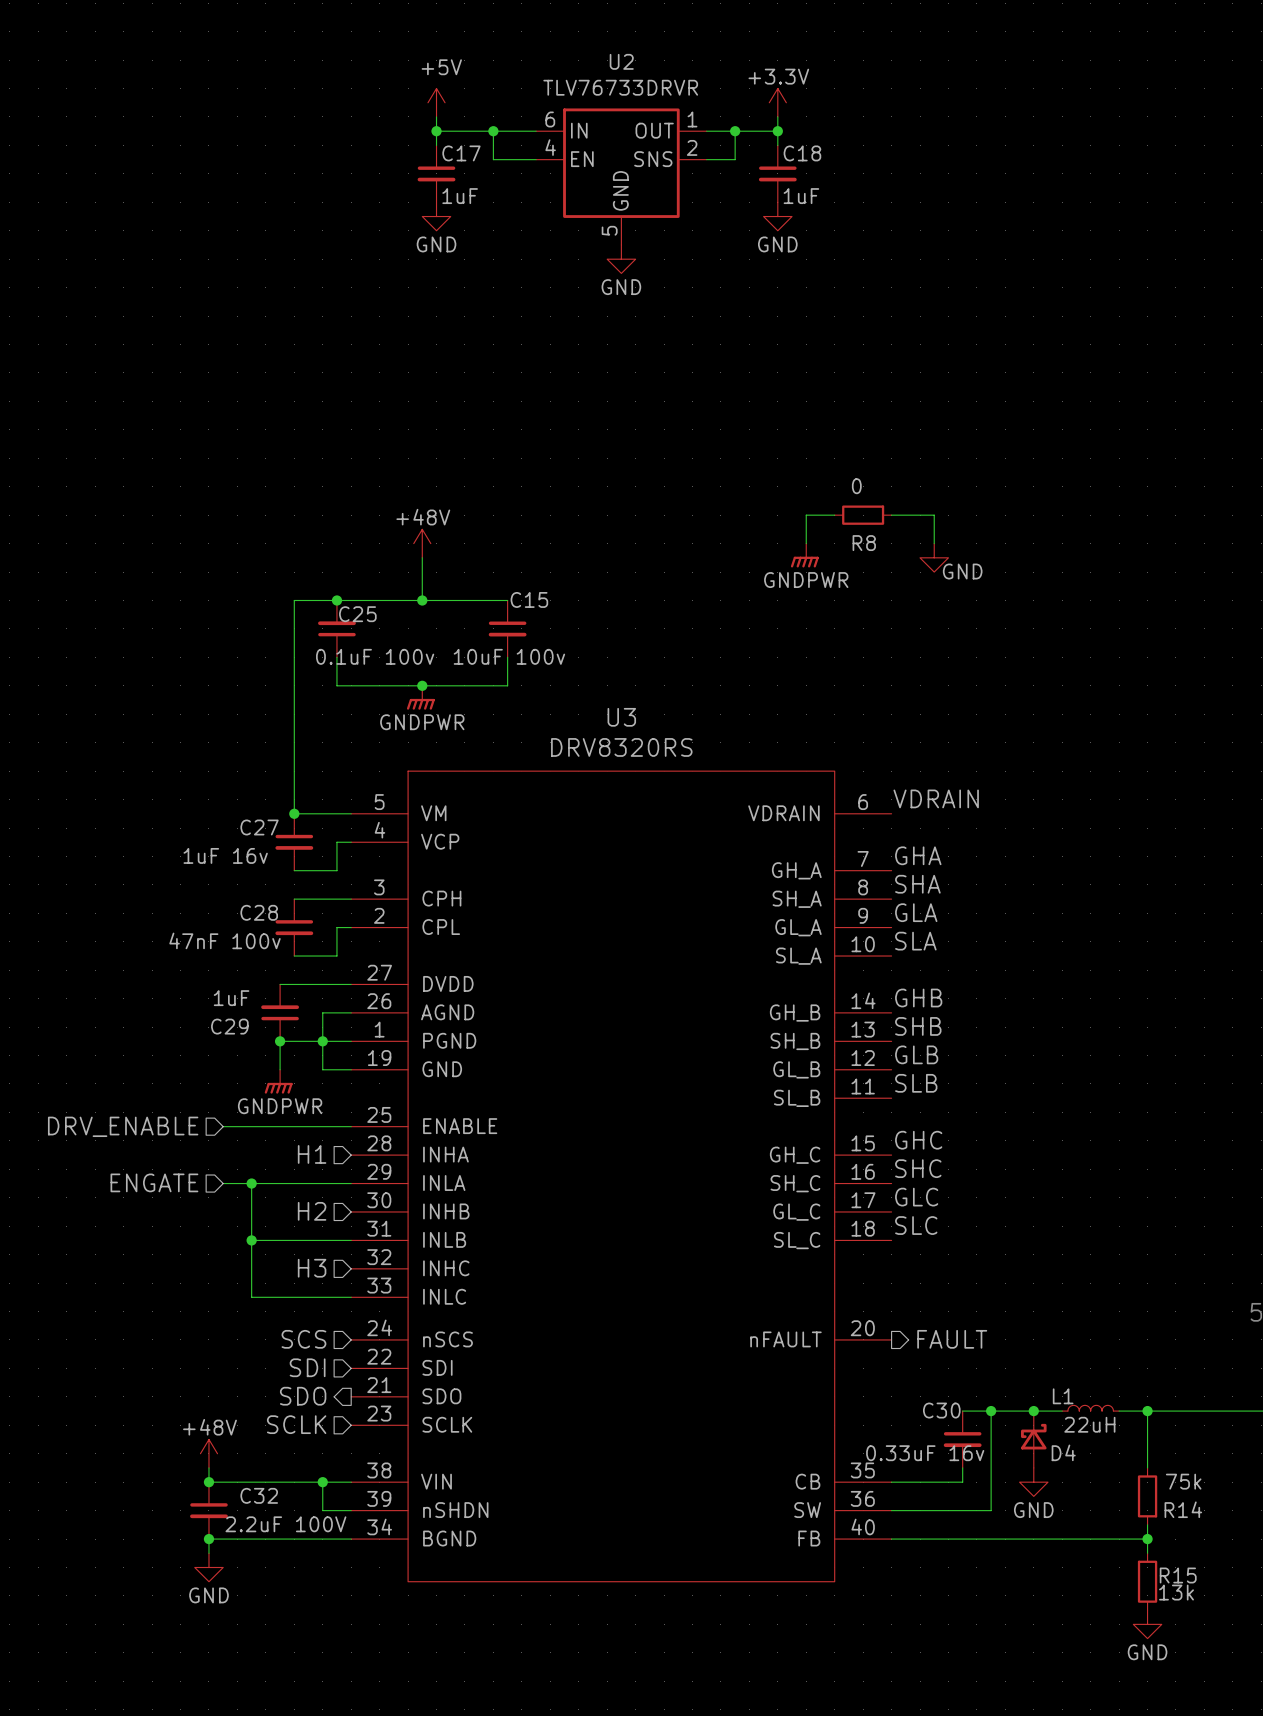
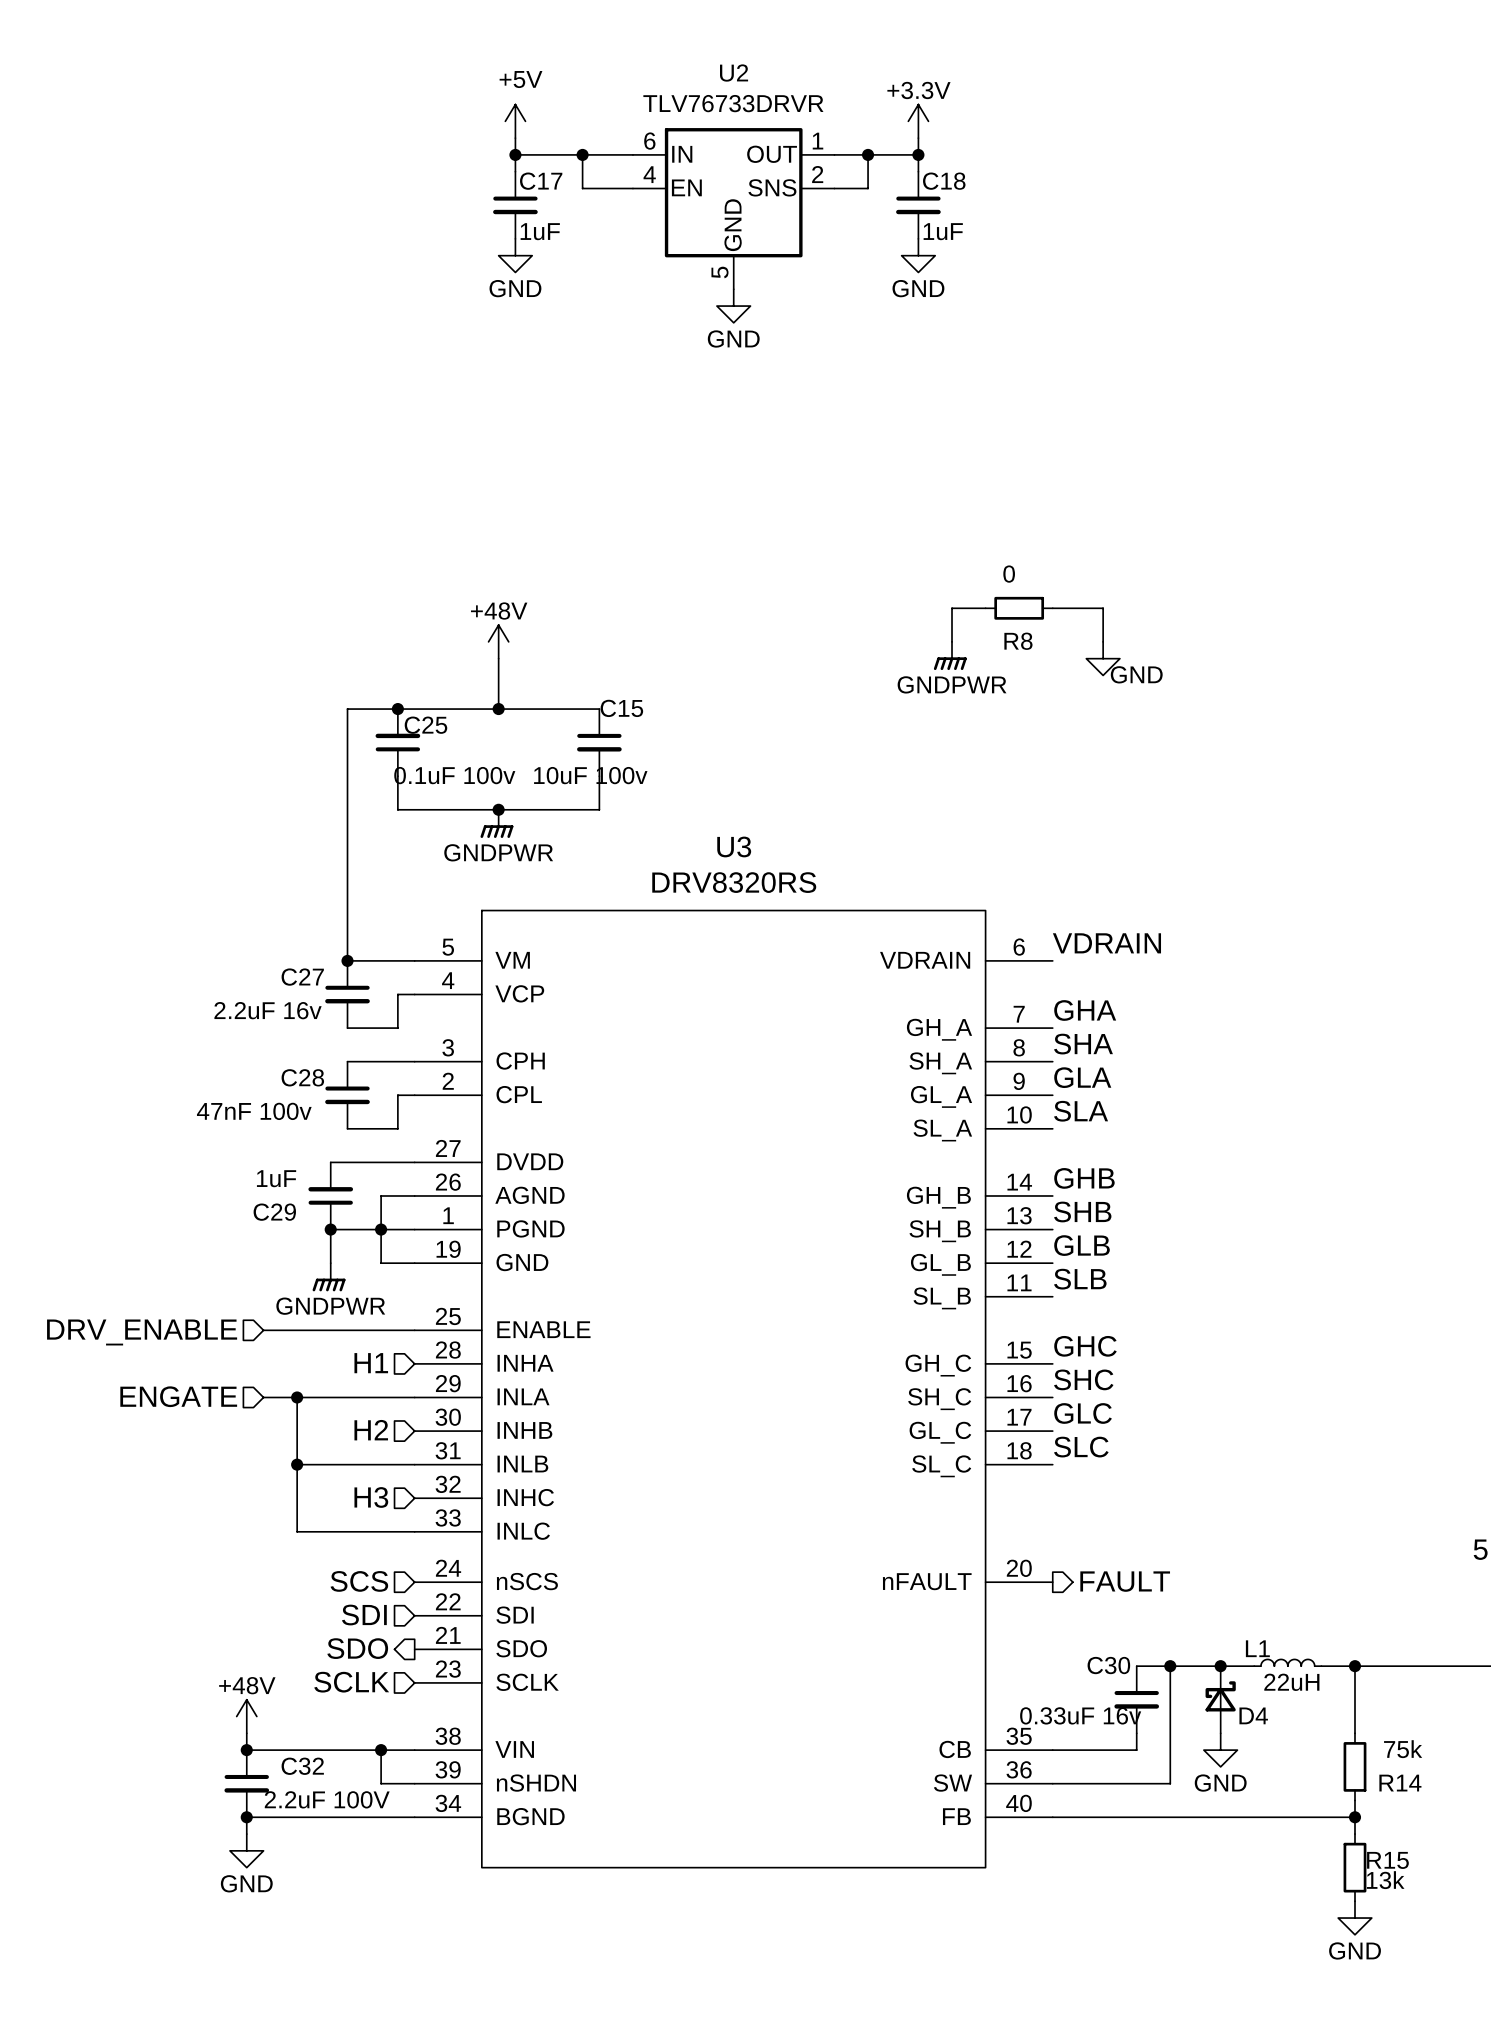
C27 value: 1uF 16v (225, 855) -> 2.2uF 16v (268, 1010)

